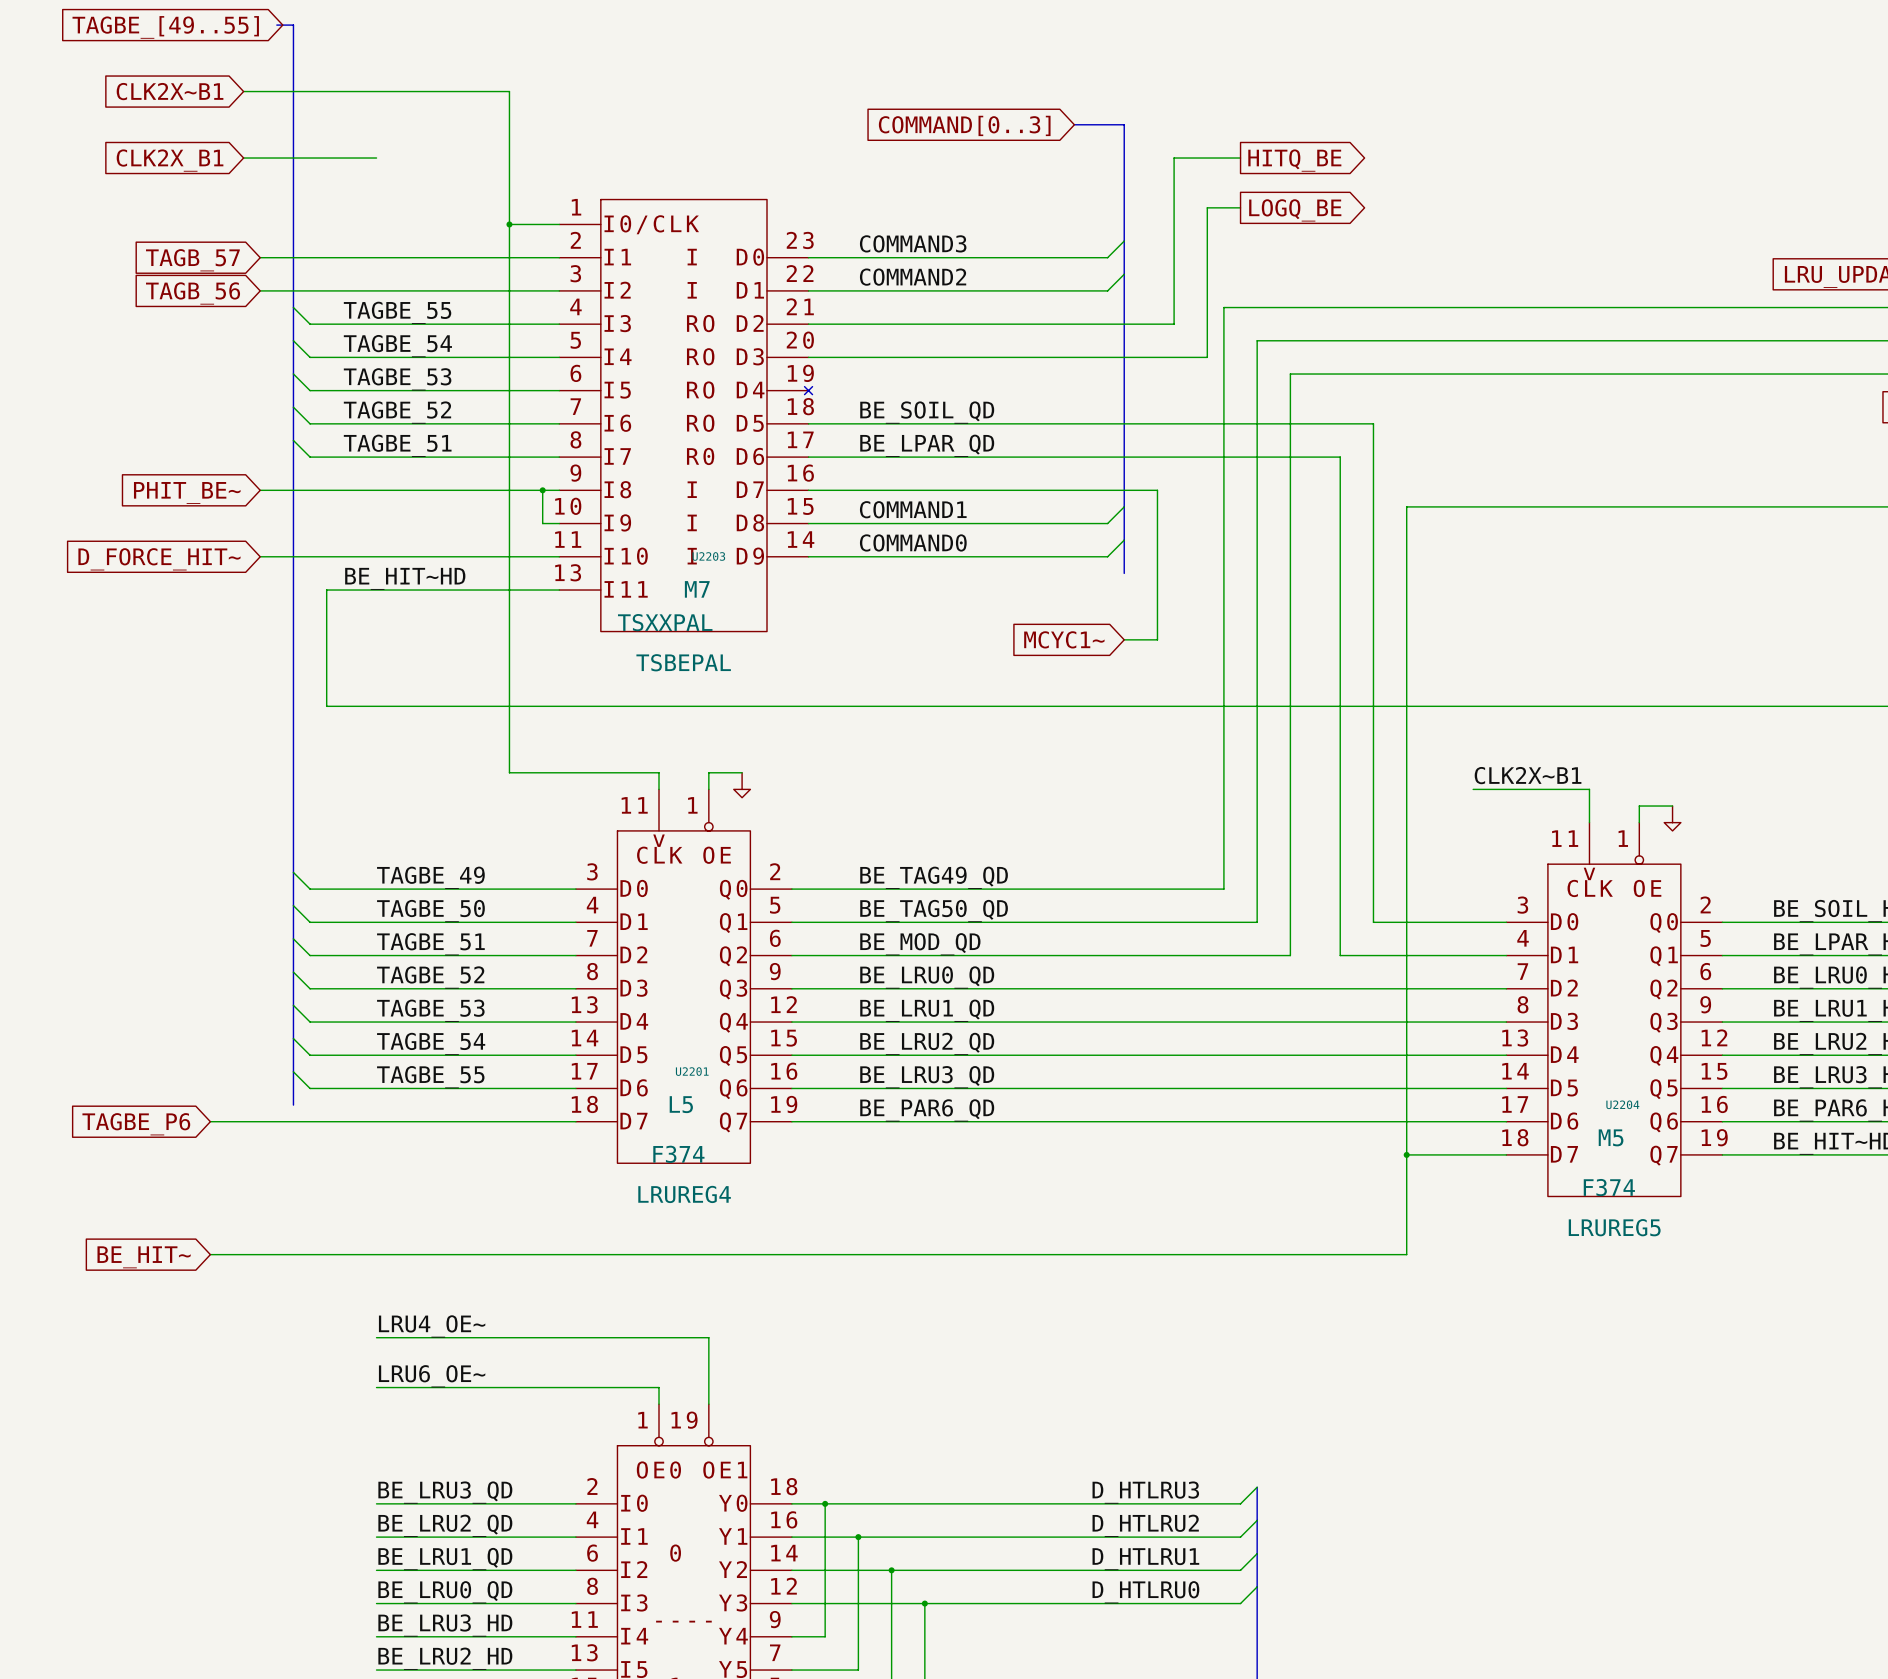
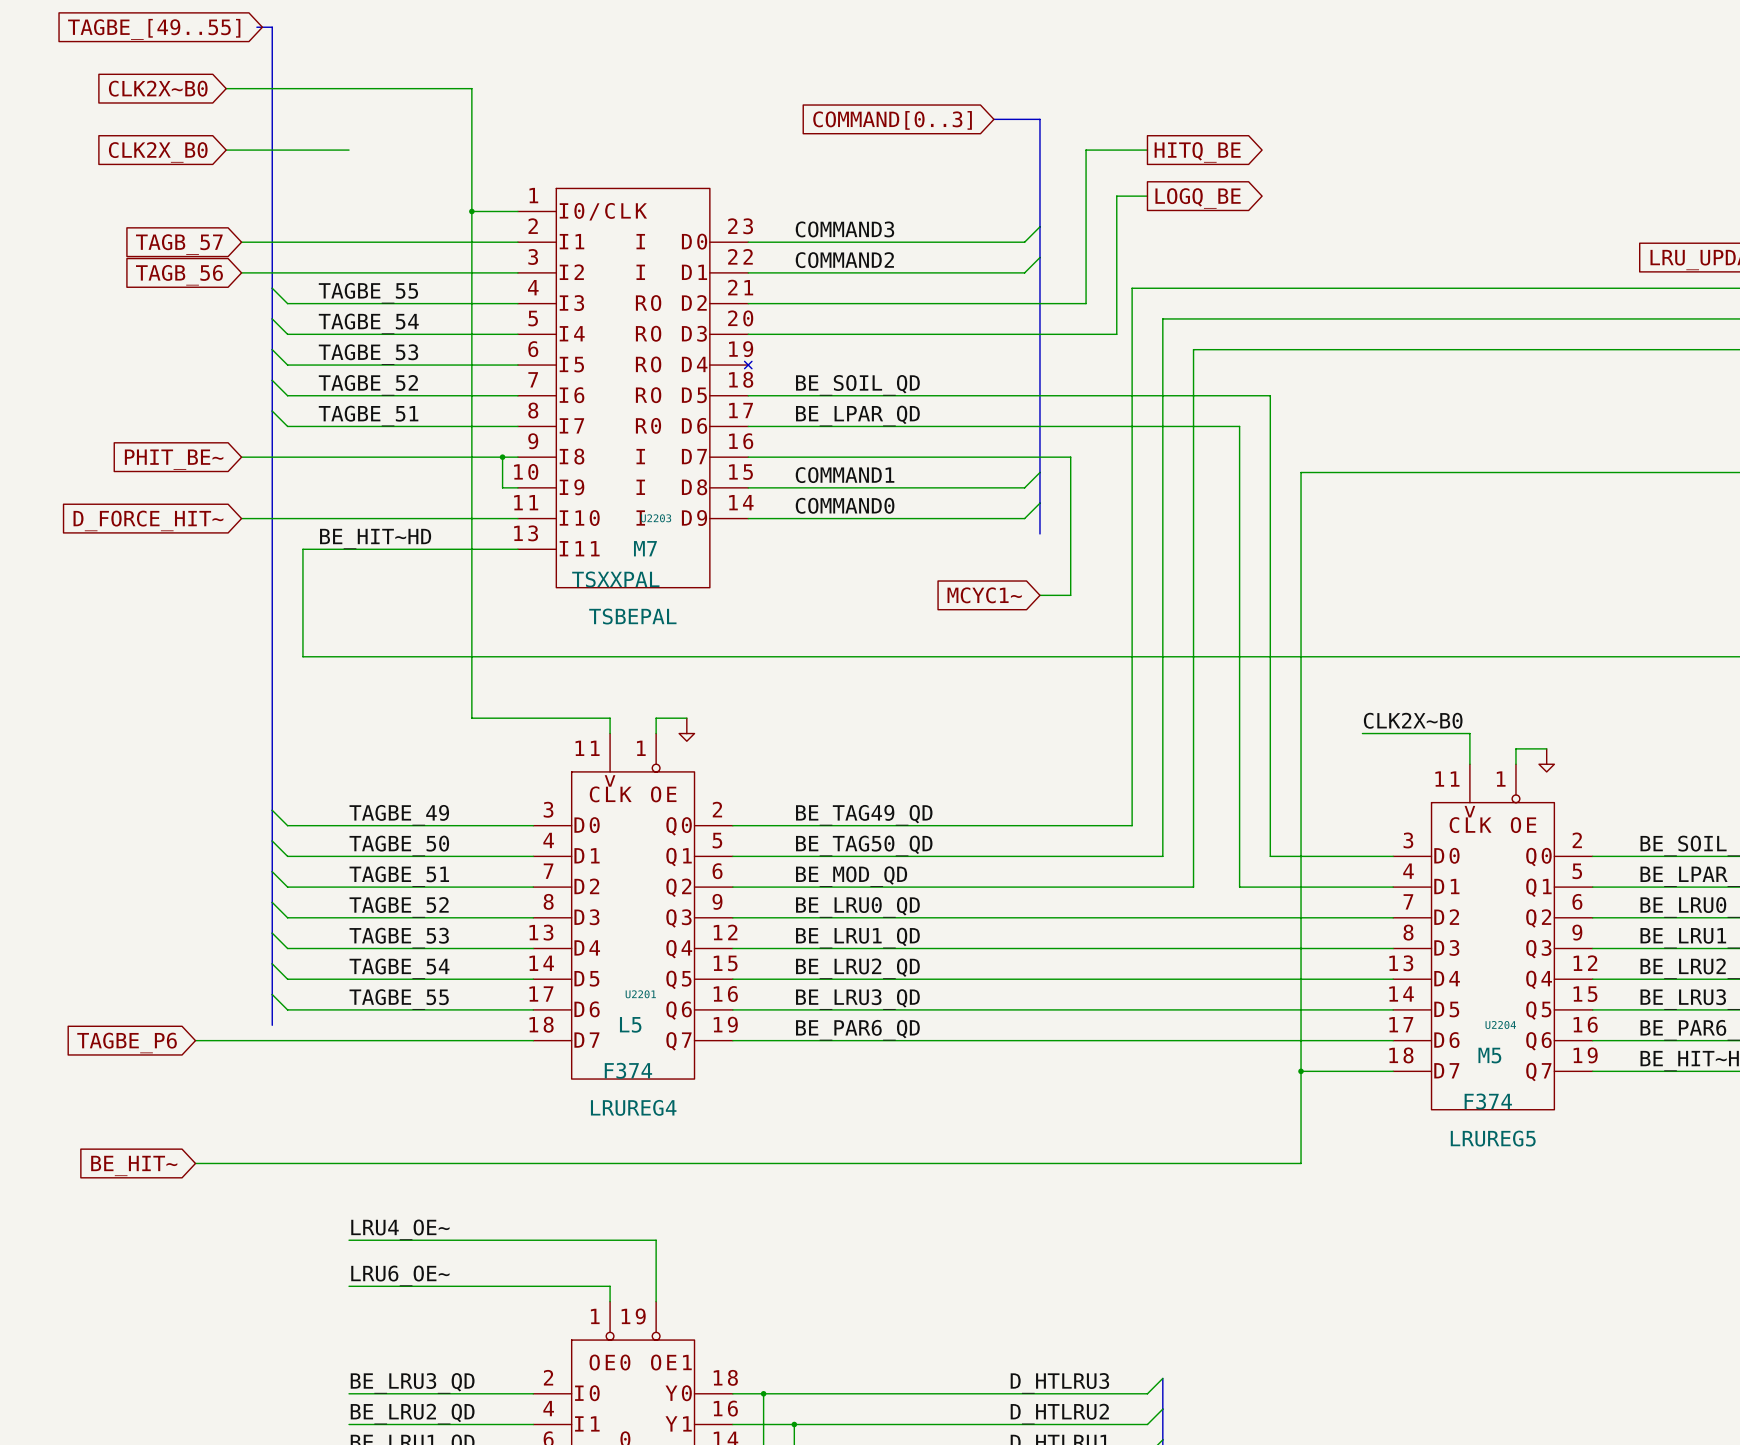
global label: CLK2X~B1 (170, 91) -> CLK2X~B0 (158, 88)
global label: CLK2X_B1 (170, 160) -> CLK2X_B0 (158, 152)
label: CLK2X~B1 (1528, 775) -> CLK2X~B0 (1413, 720)

